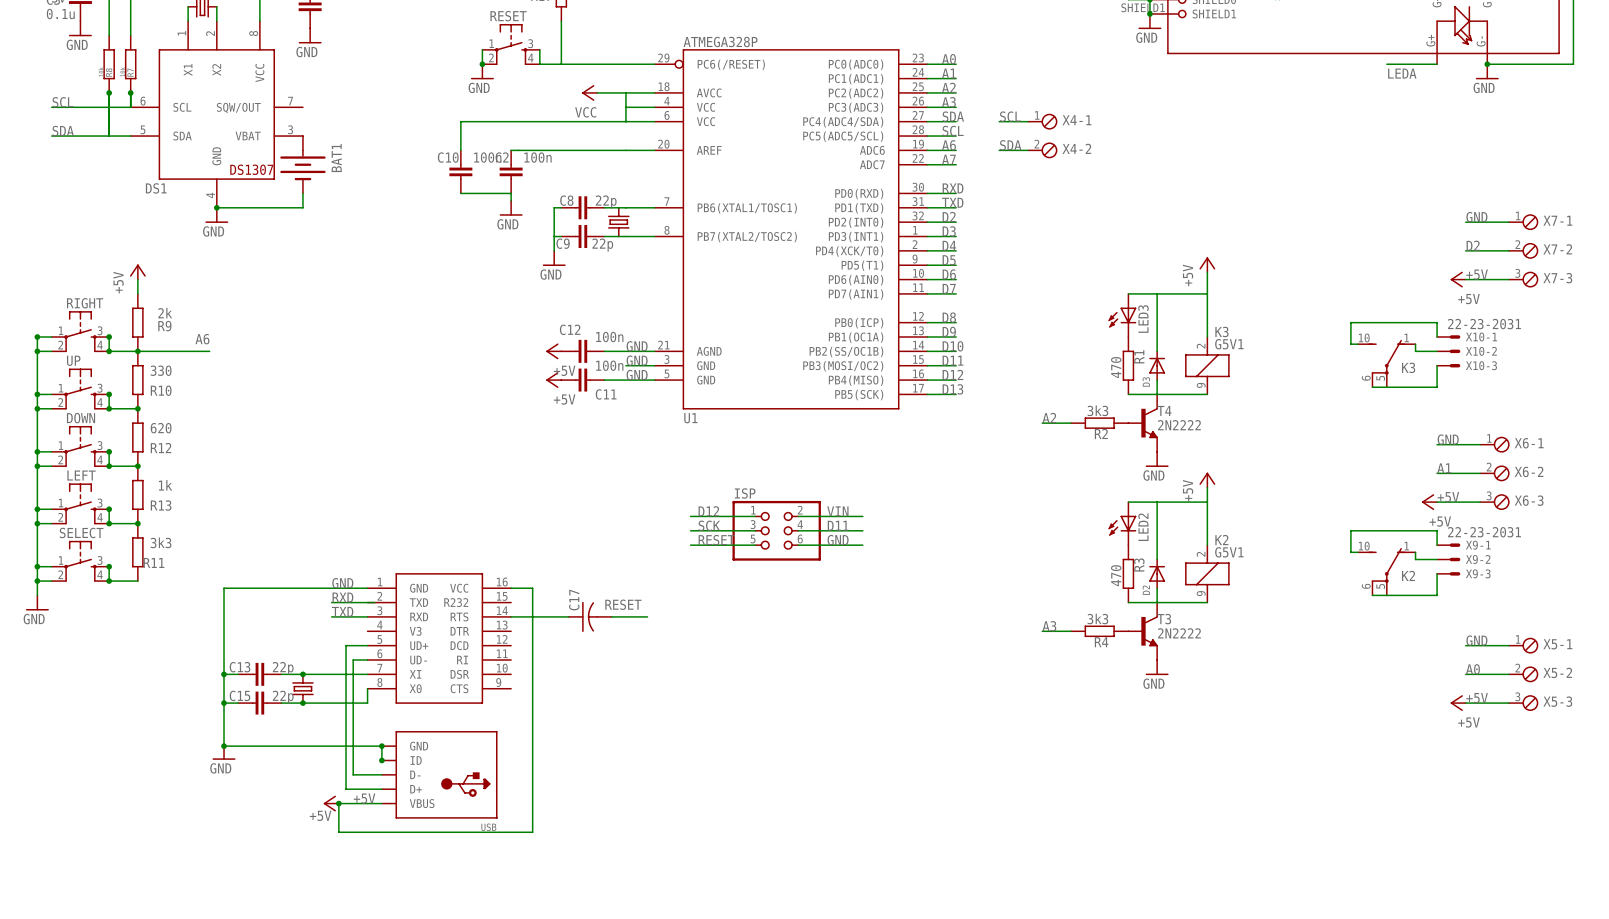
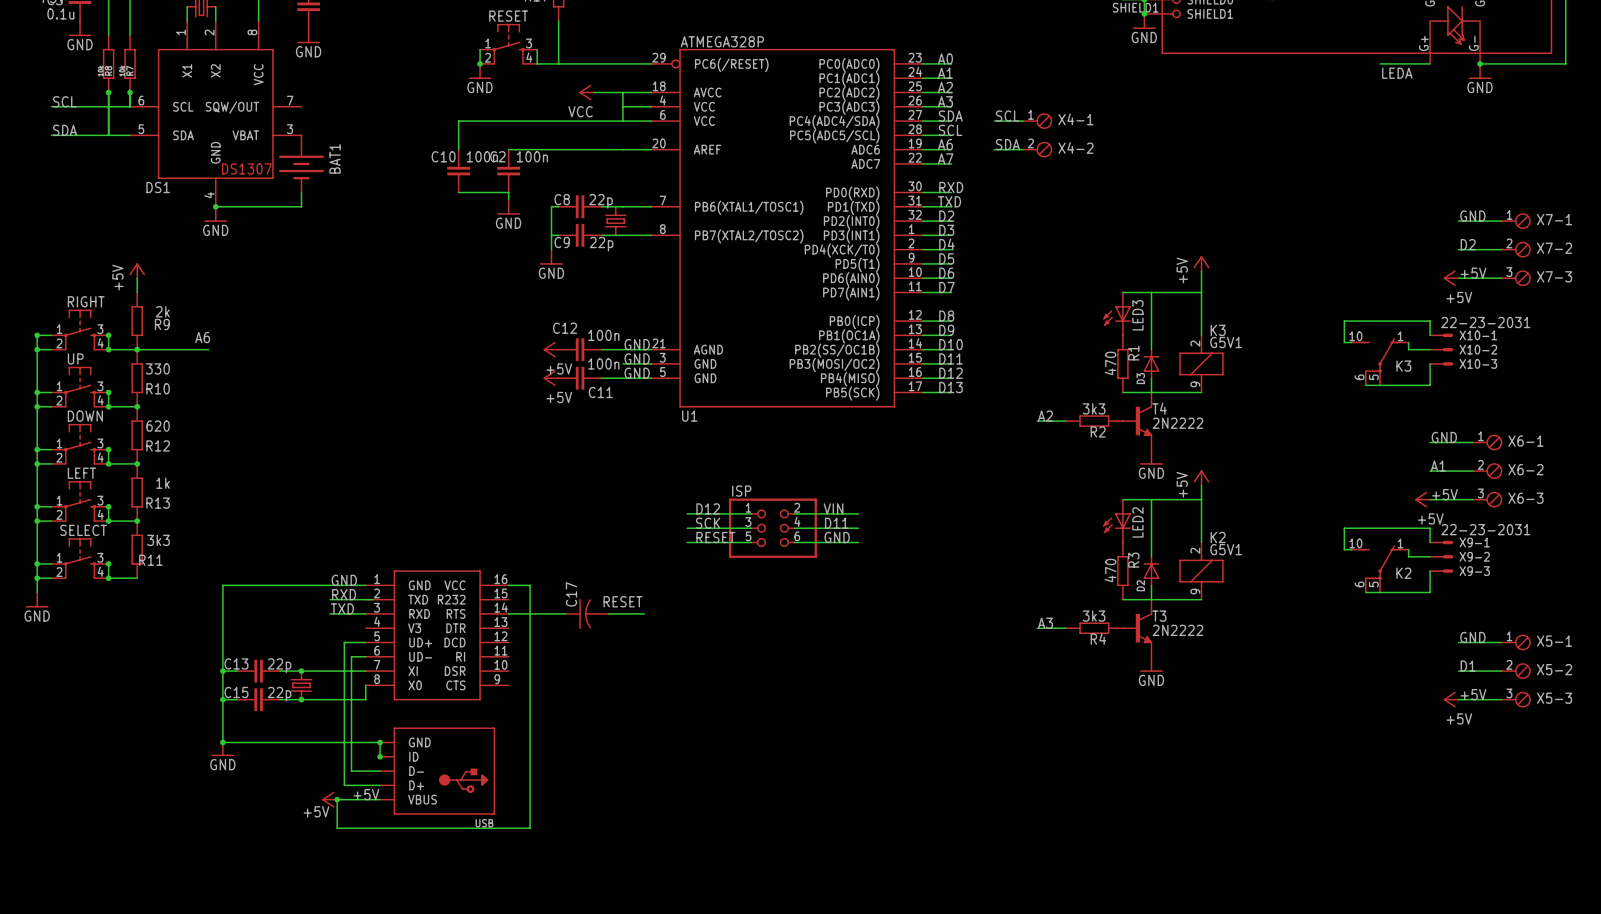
label: A0 (1472, 669) -> D1 (1468, 666)

